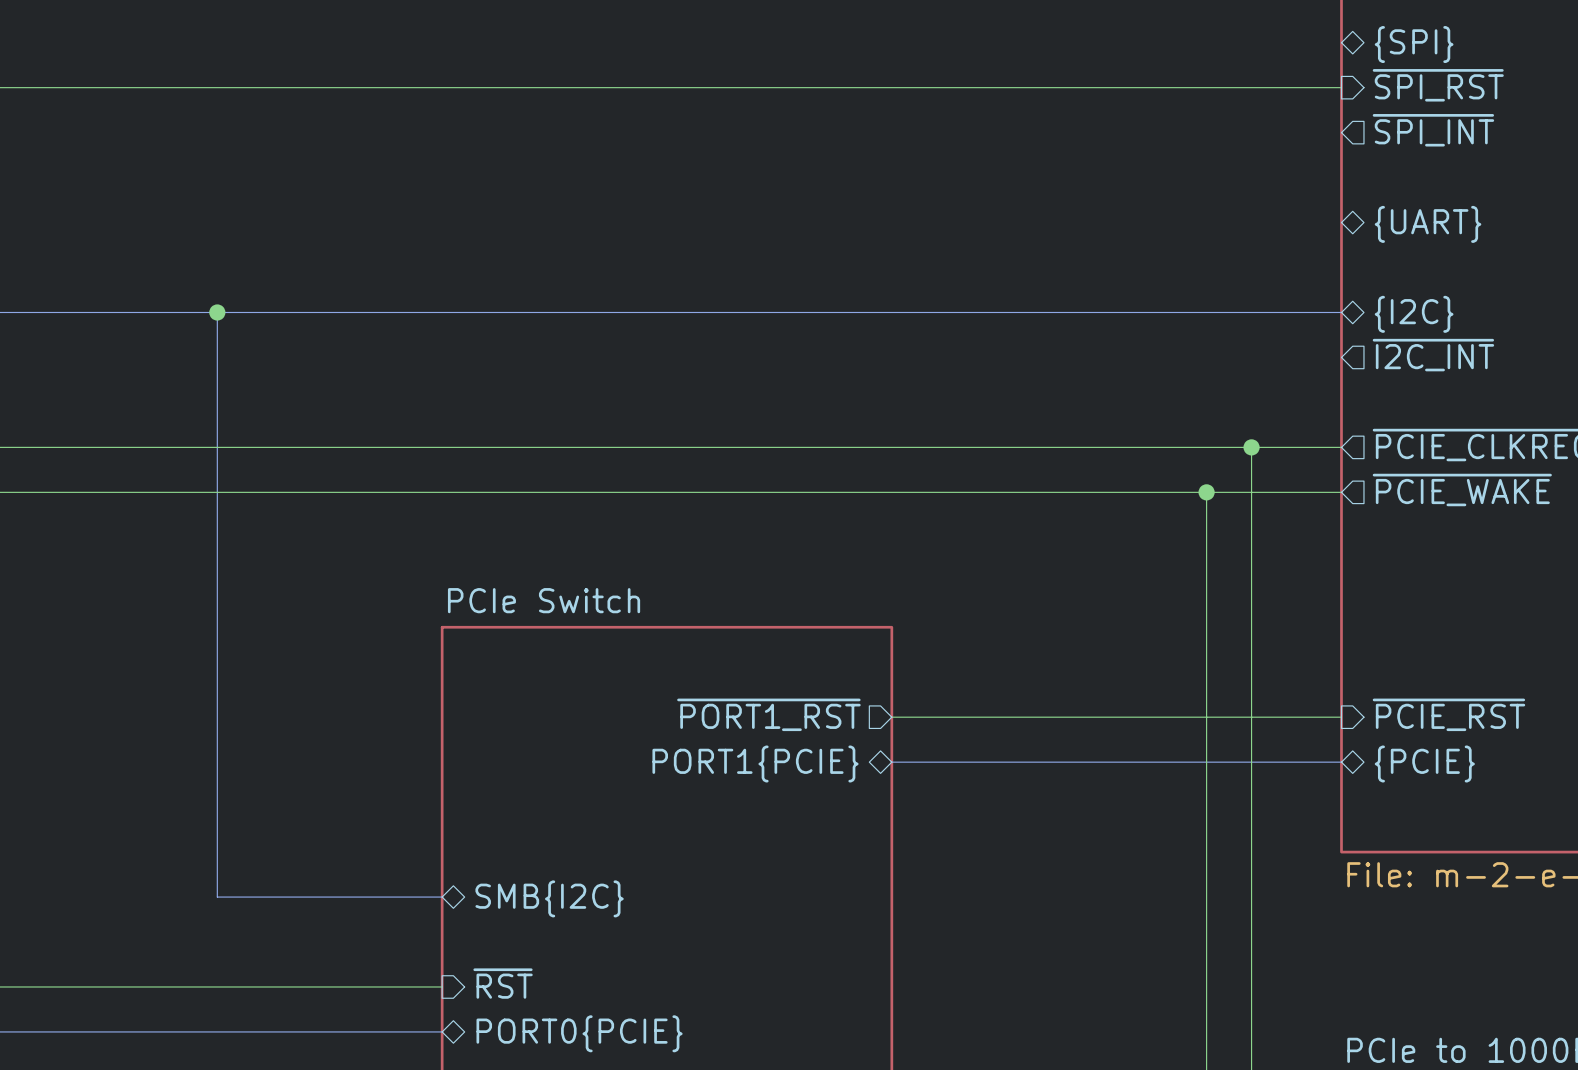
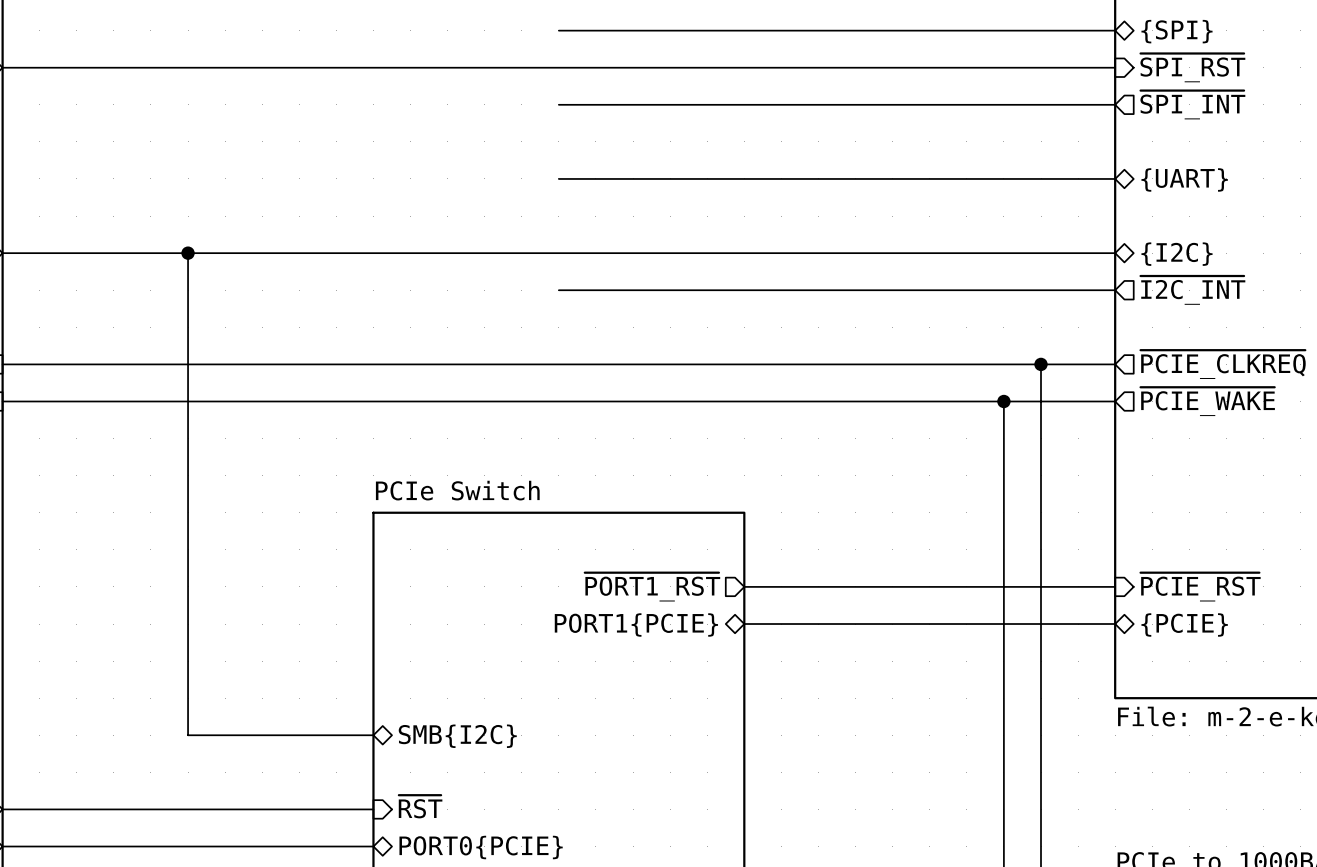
bus: none -> (558, 30) (1115, 30)
wire: none -> (558, 104) (1115, 104)
bus: none -> (558, 178) (1115, 178)
wire: none -> (558, 290) (1115, 290)

